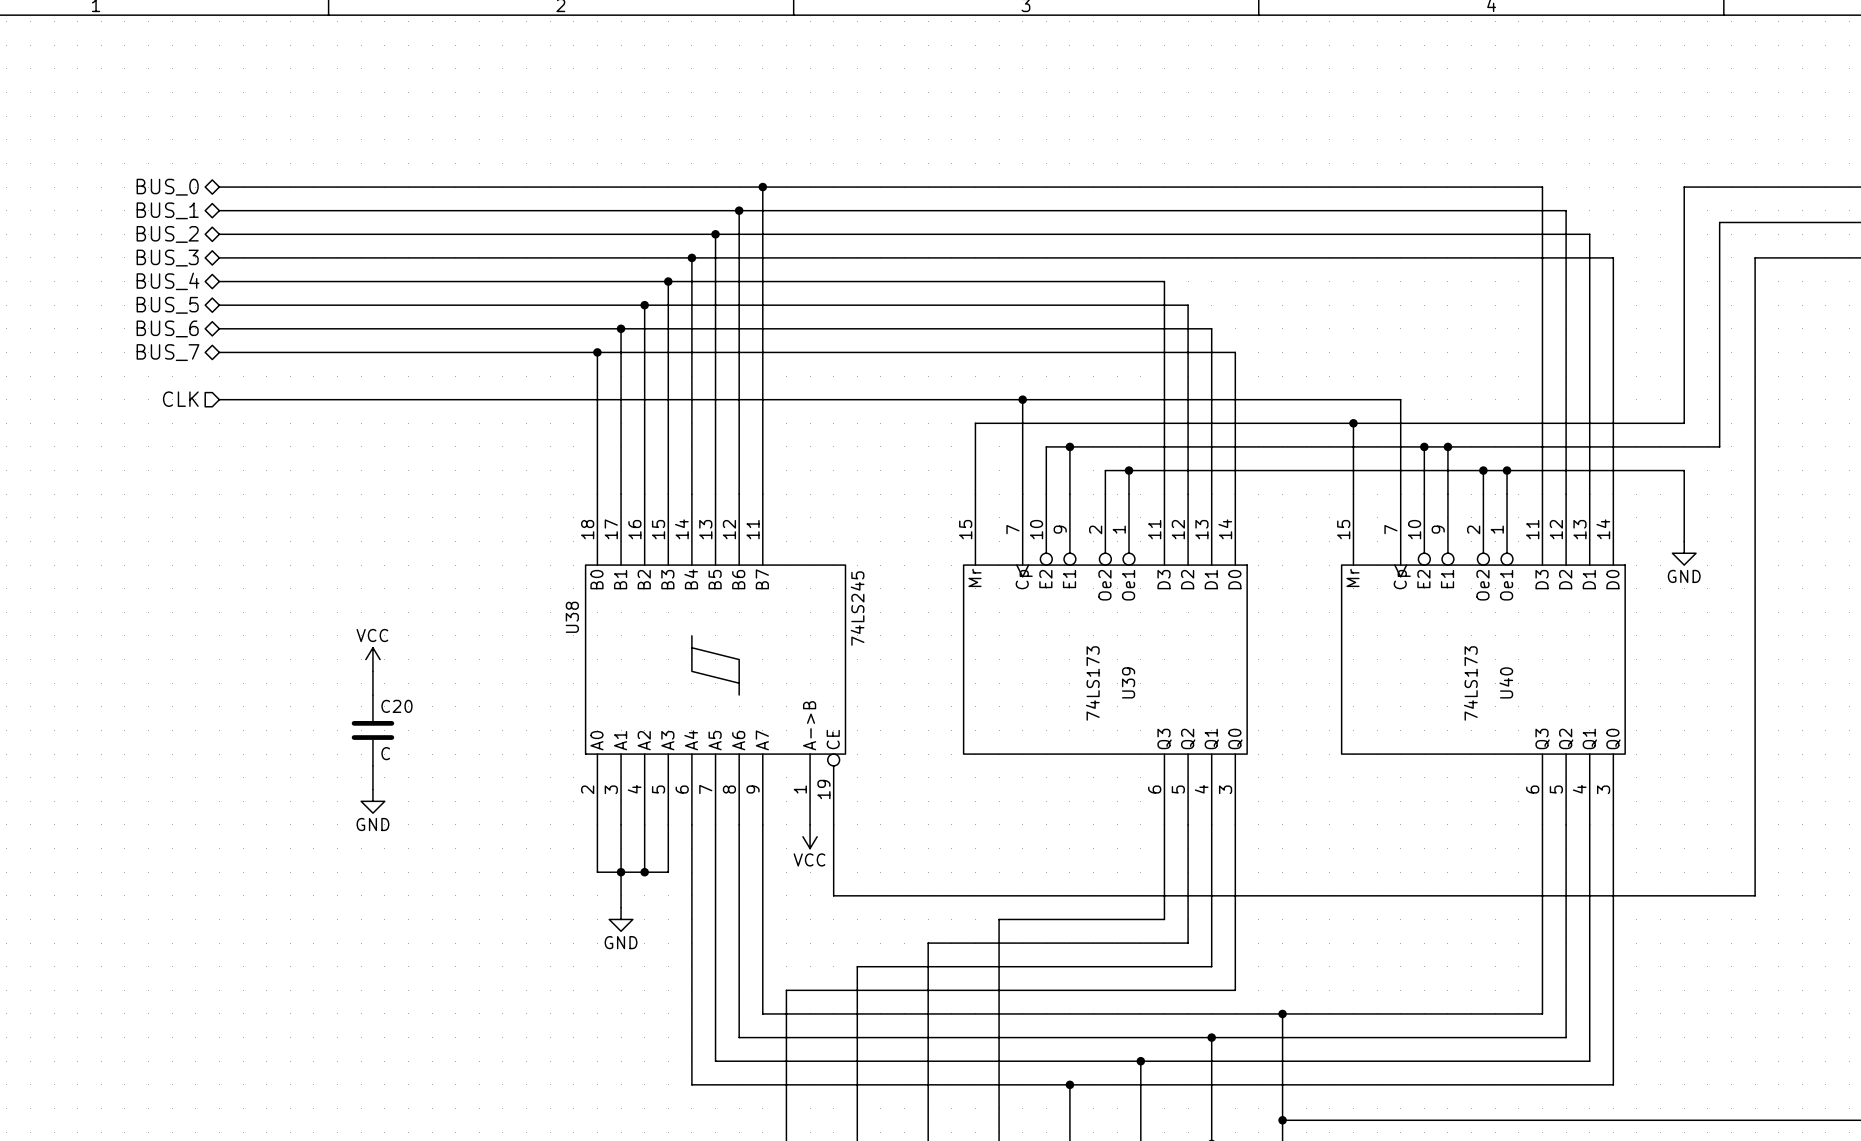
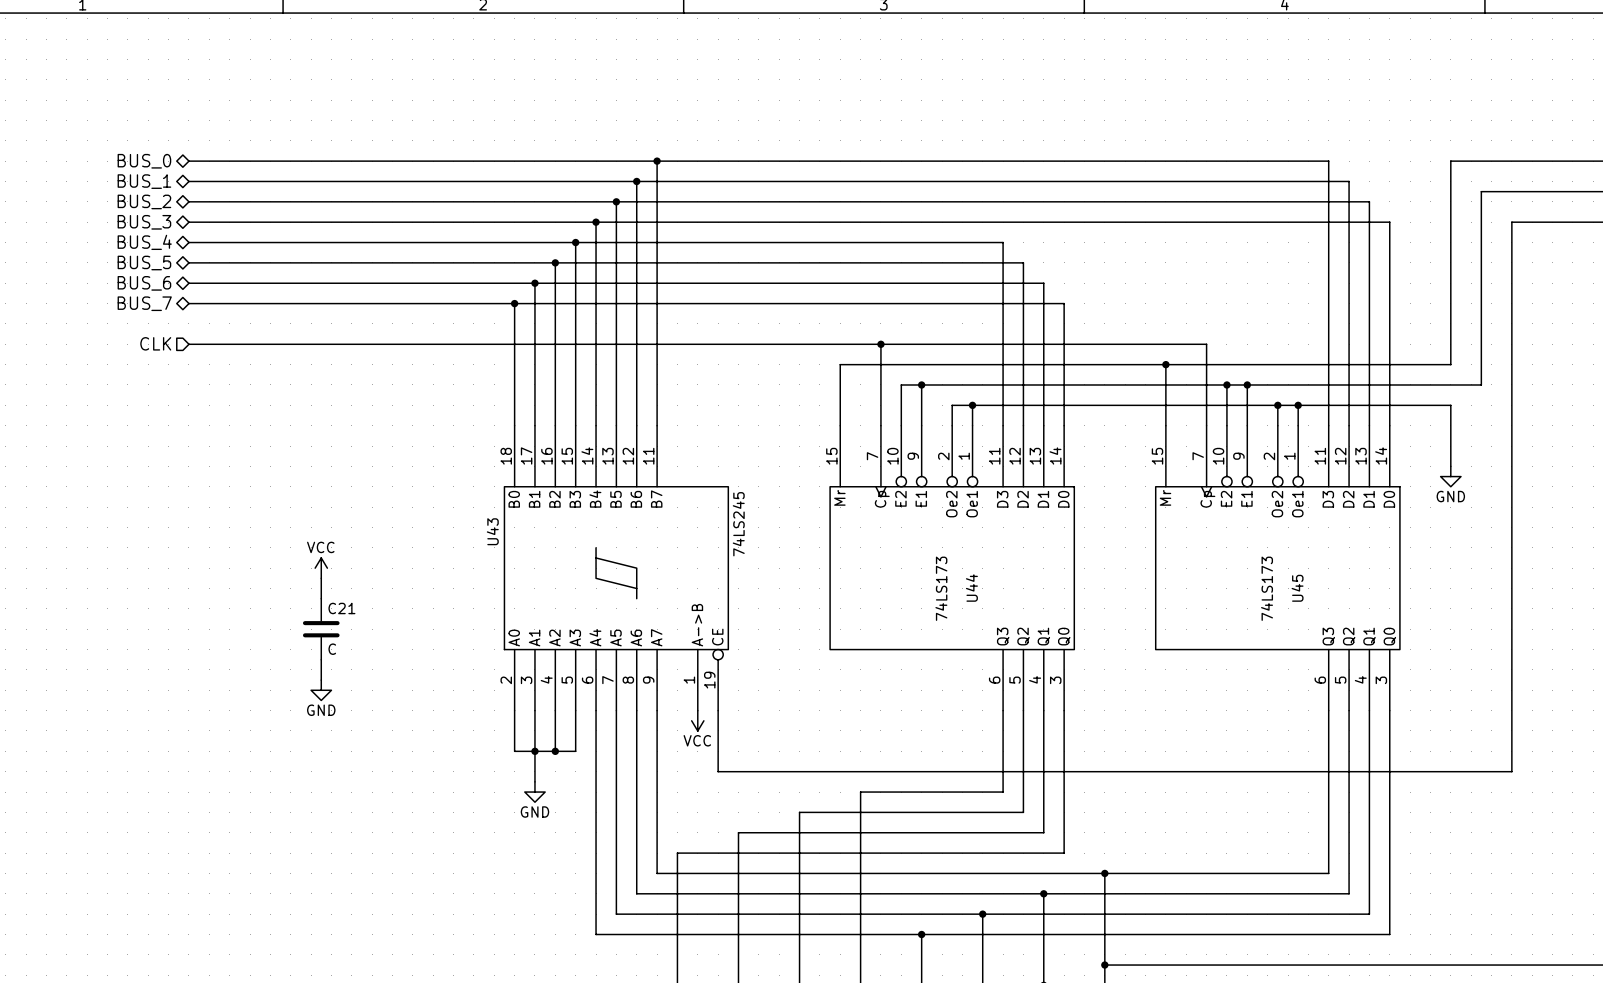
U38 name: U38 (572, 617) -> U43 (492, 531)
U39 name: U39 (1128, 682) -> U44 (971, 588)
U40 name: U40 (1506, 682) -> U45 (1297, 588)
C20 name: C20 (396, 706) -> C21 (341, 608)

